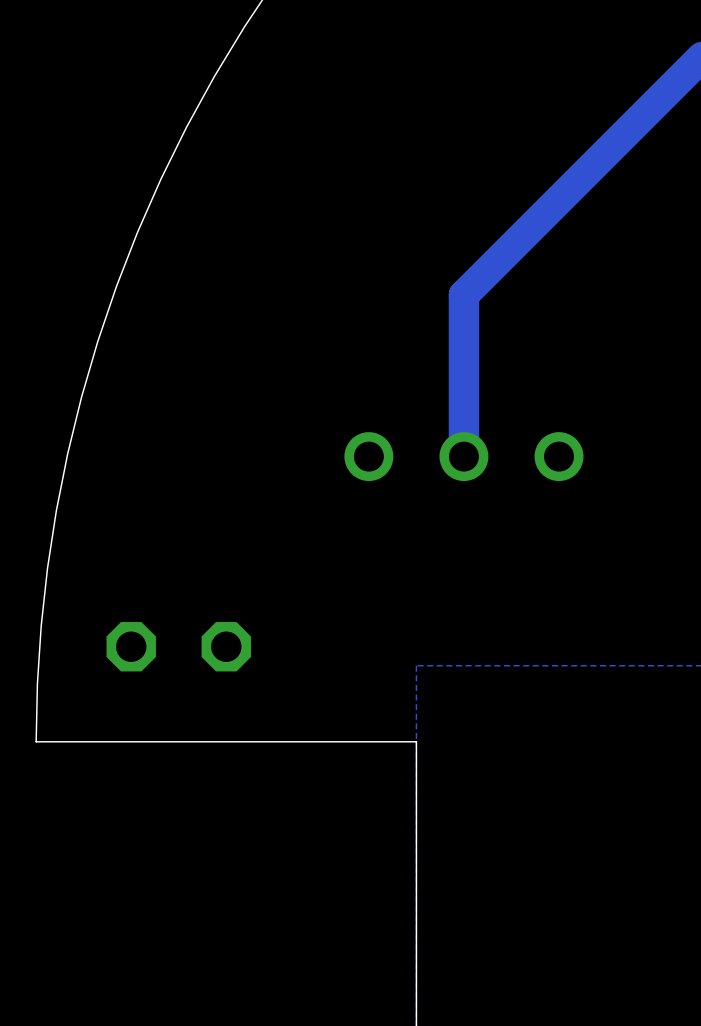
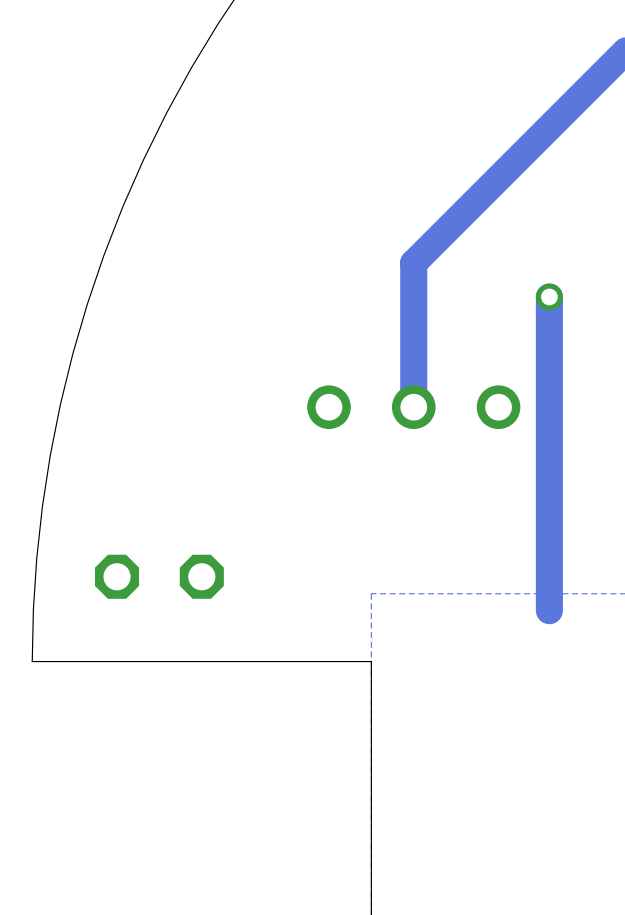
track: none -> (549, 296) (549, 610)
via: none -> (549, 296)

